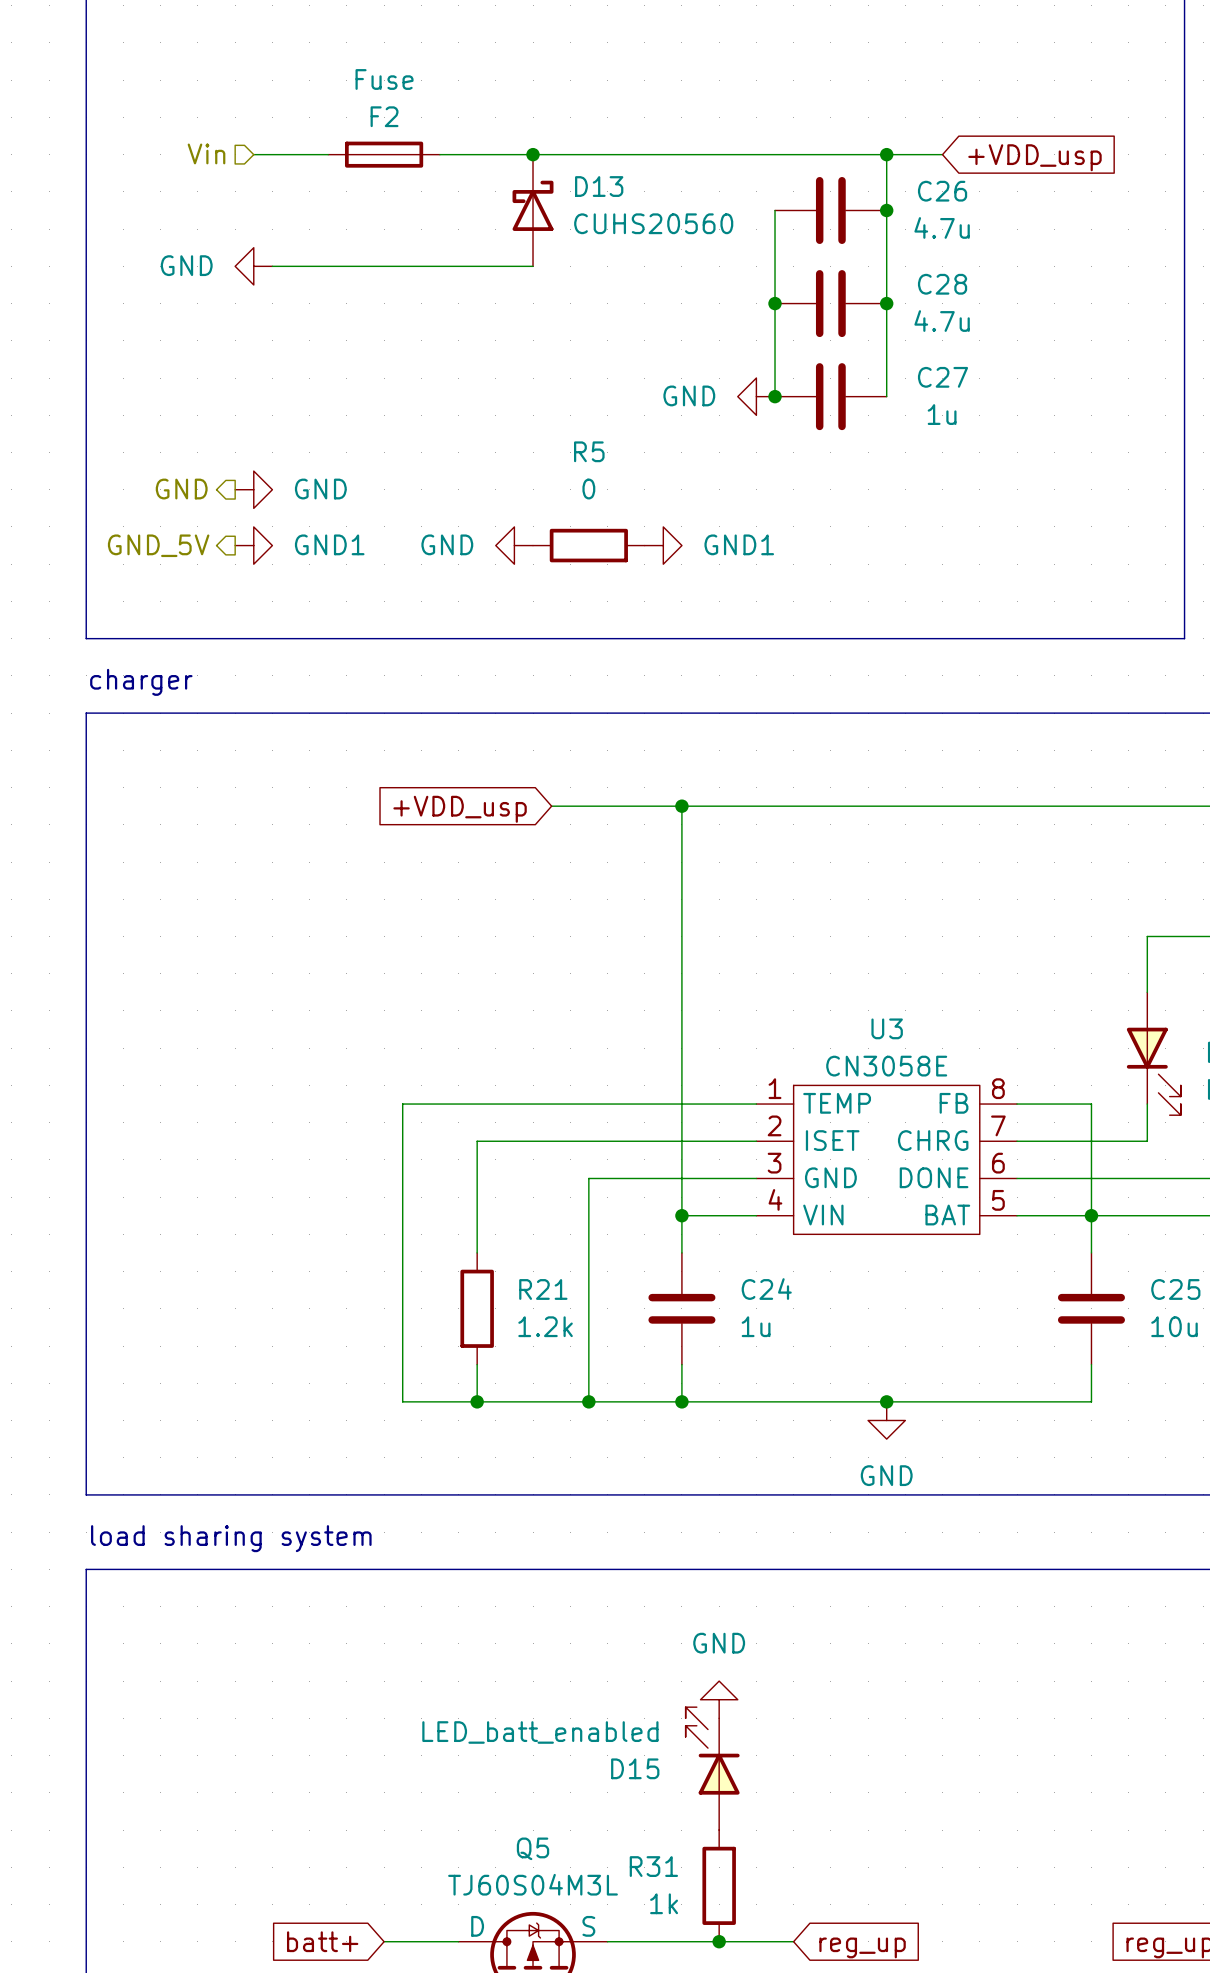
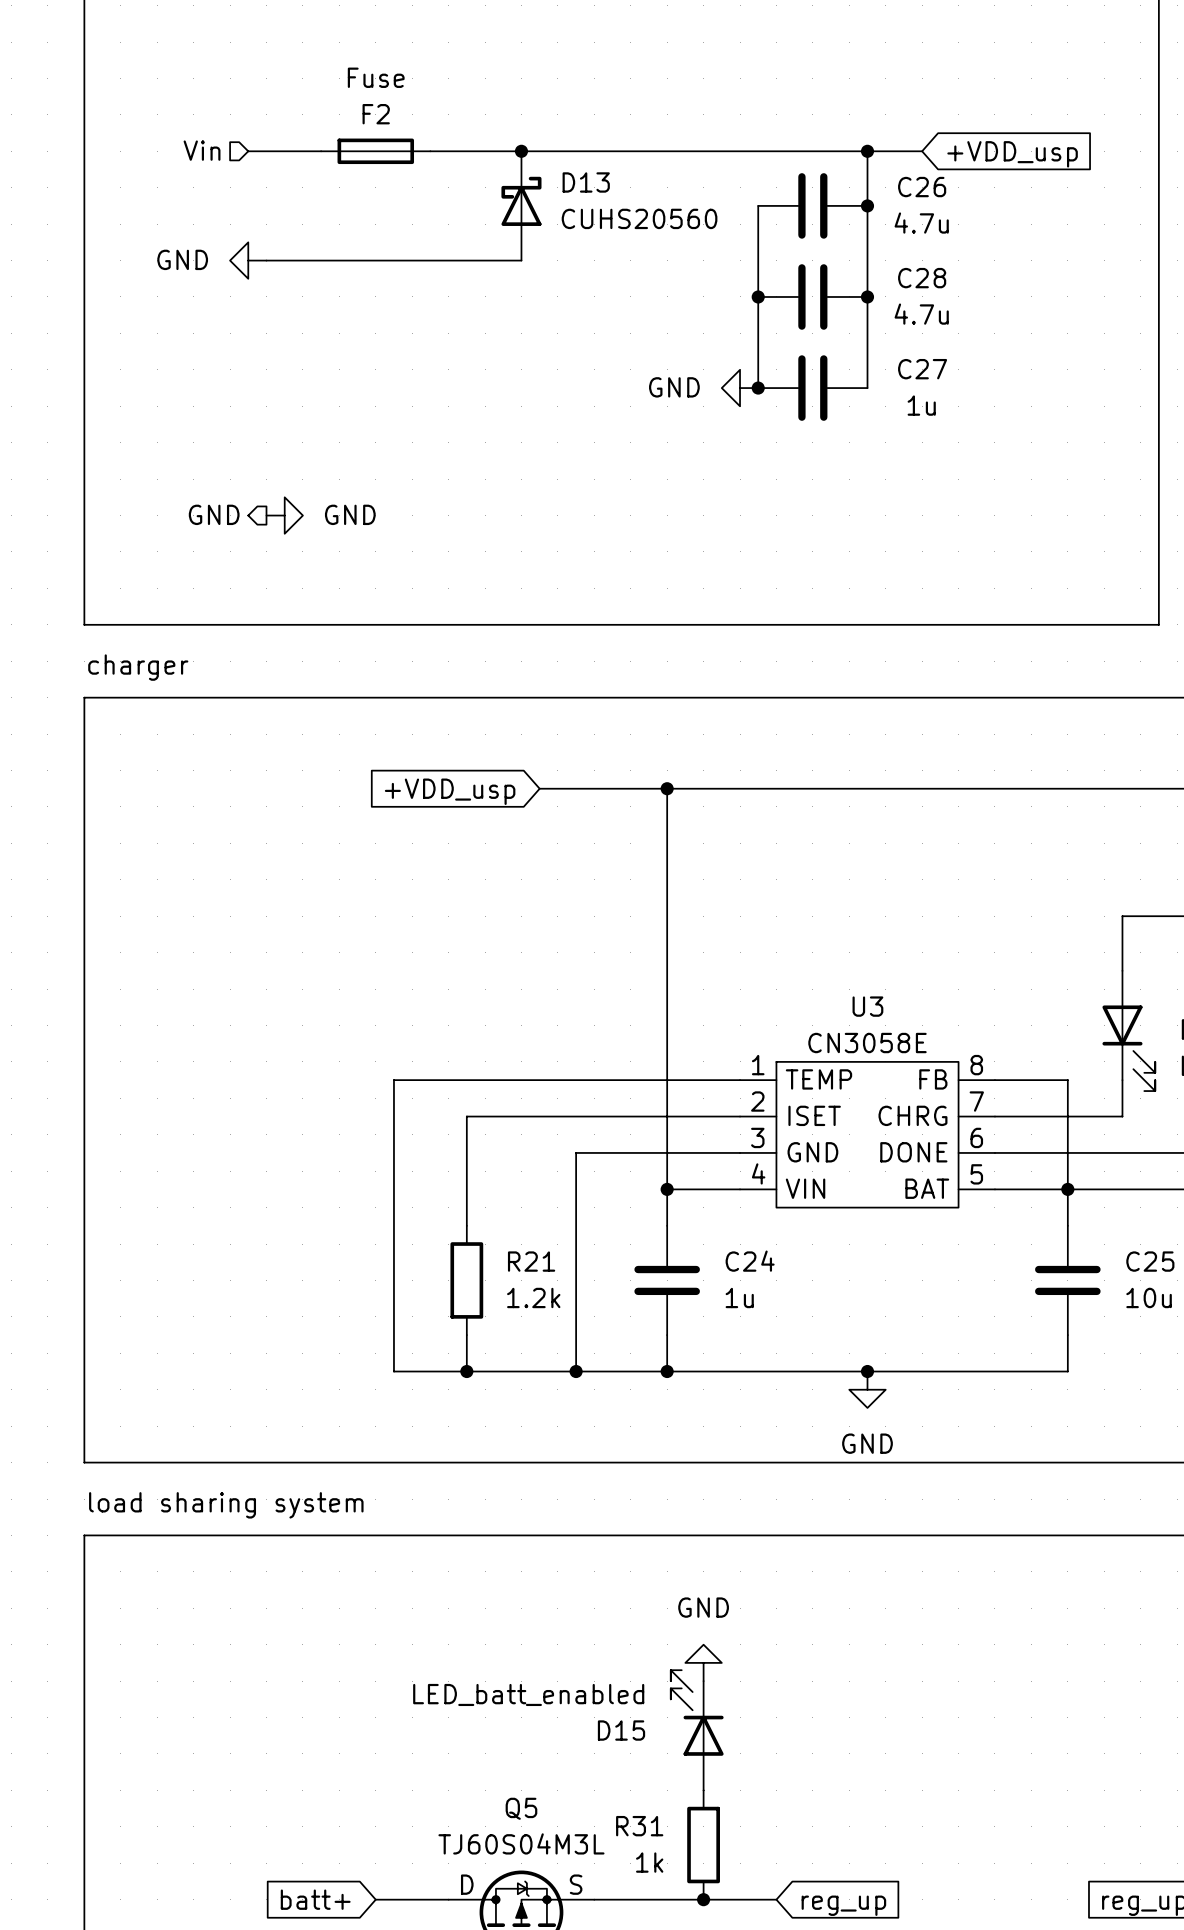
hierarchical label position: GND (181, 489) -> GND (214, 514)
power symbol position: GND (253, 489) -> GND (284, 515)
hierarchical label: GND_5V (158, 545) -> none
power symbol: GND1 (253, 545) -> none
power symbol: GND (514, 545) -> none
R5: 0 (588, 545) -> none
power symbol: GND1 (663, 545) -> none

